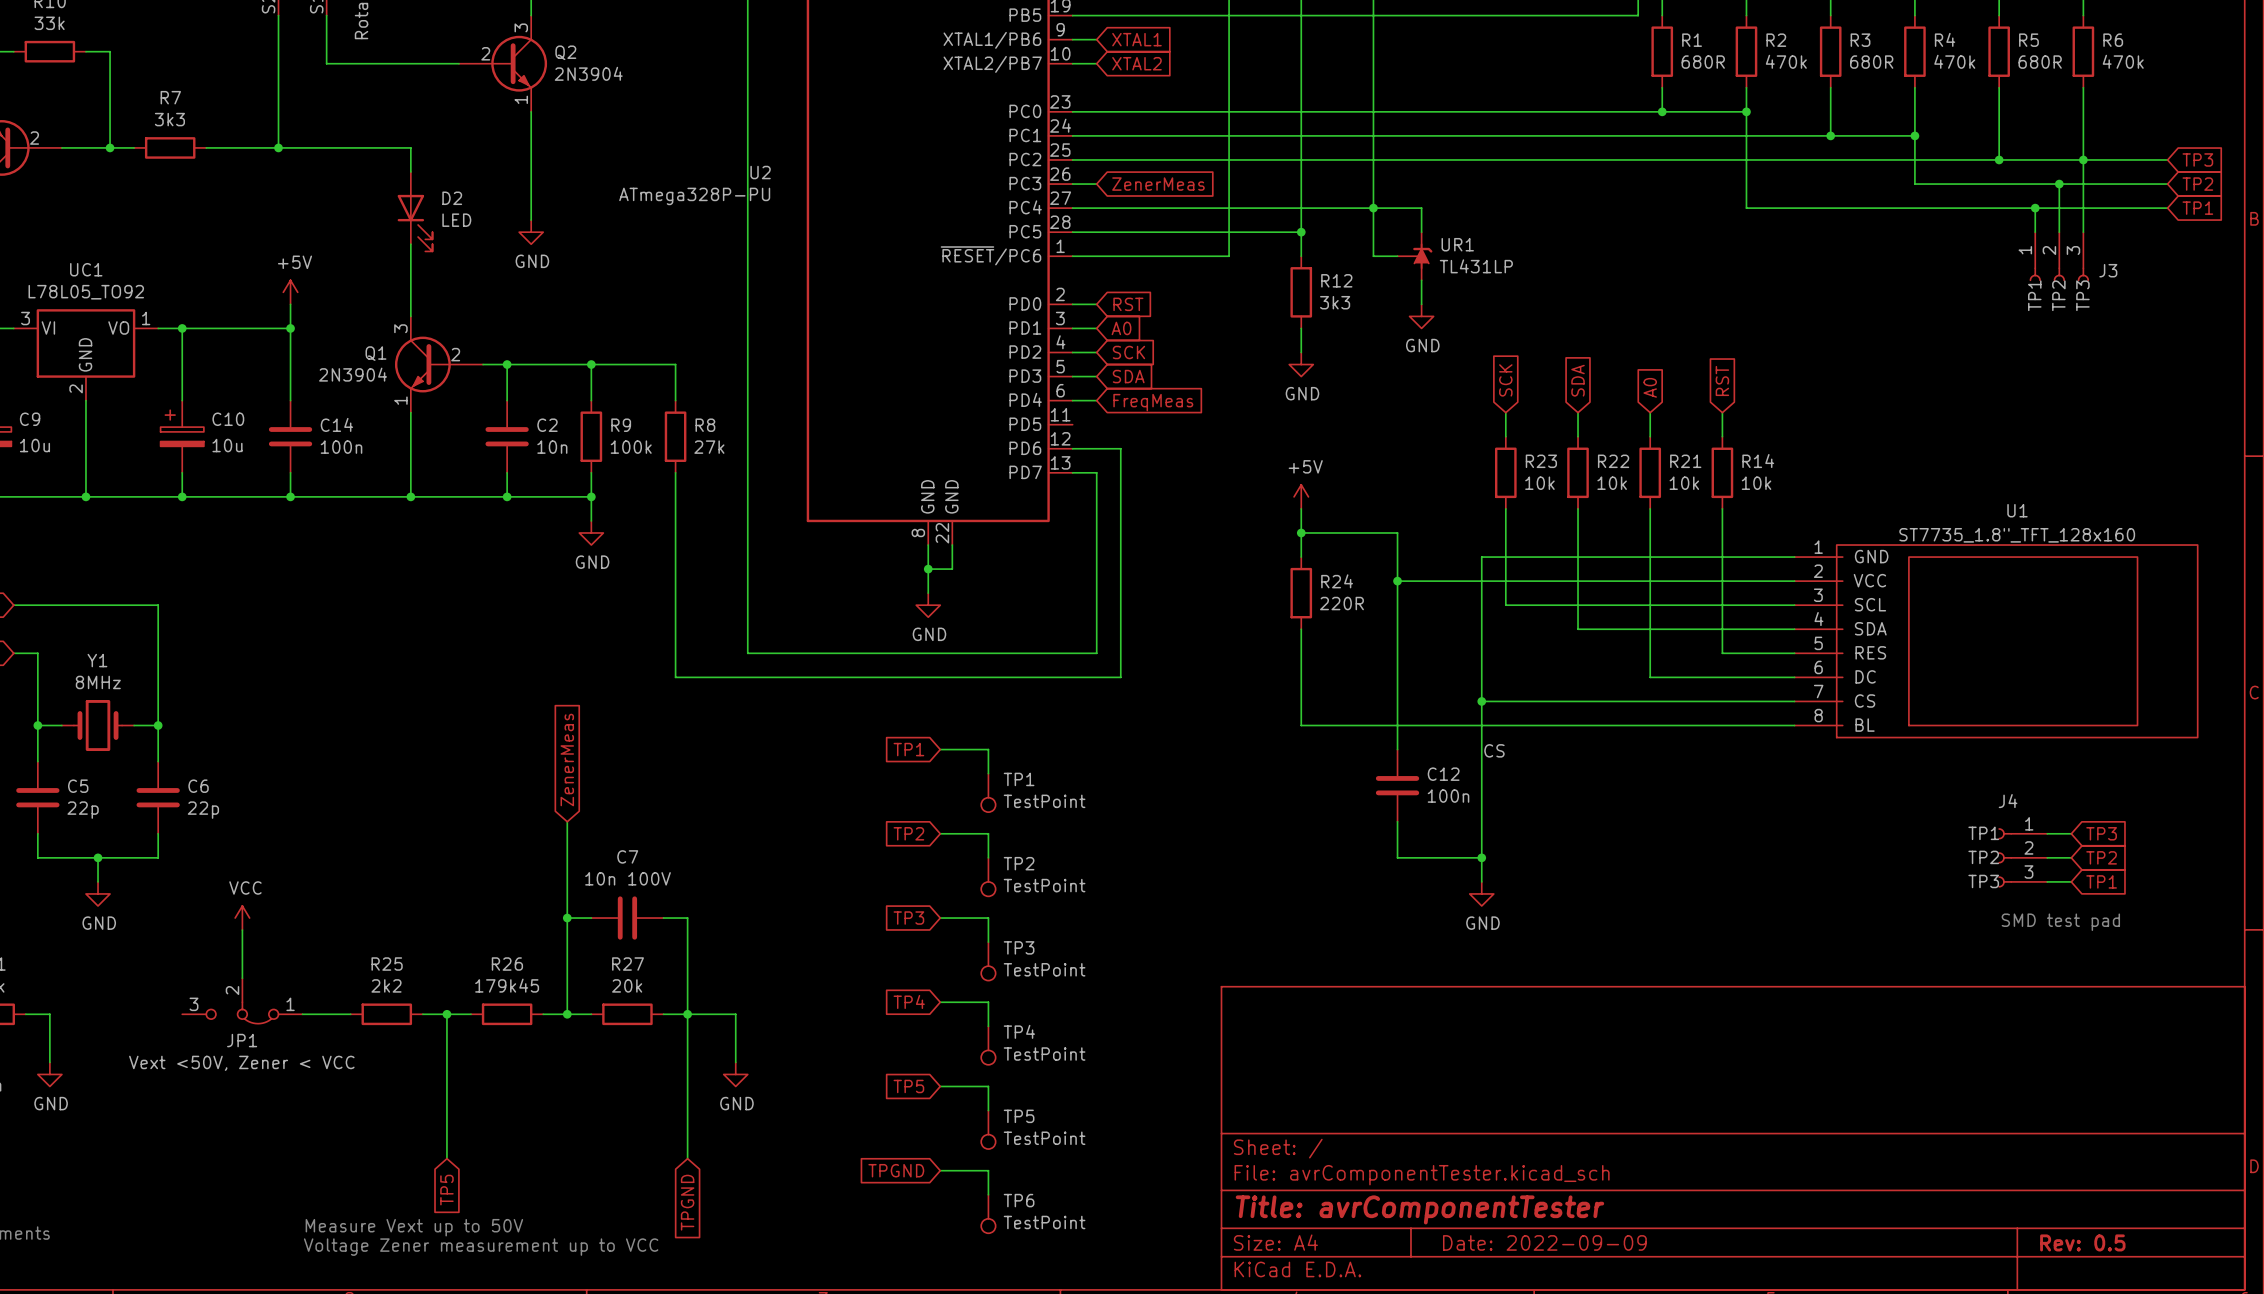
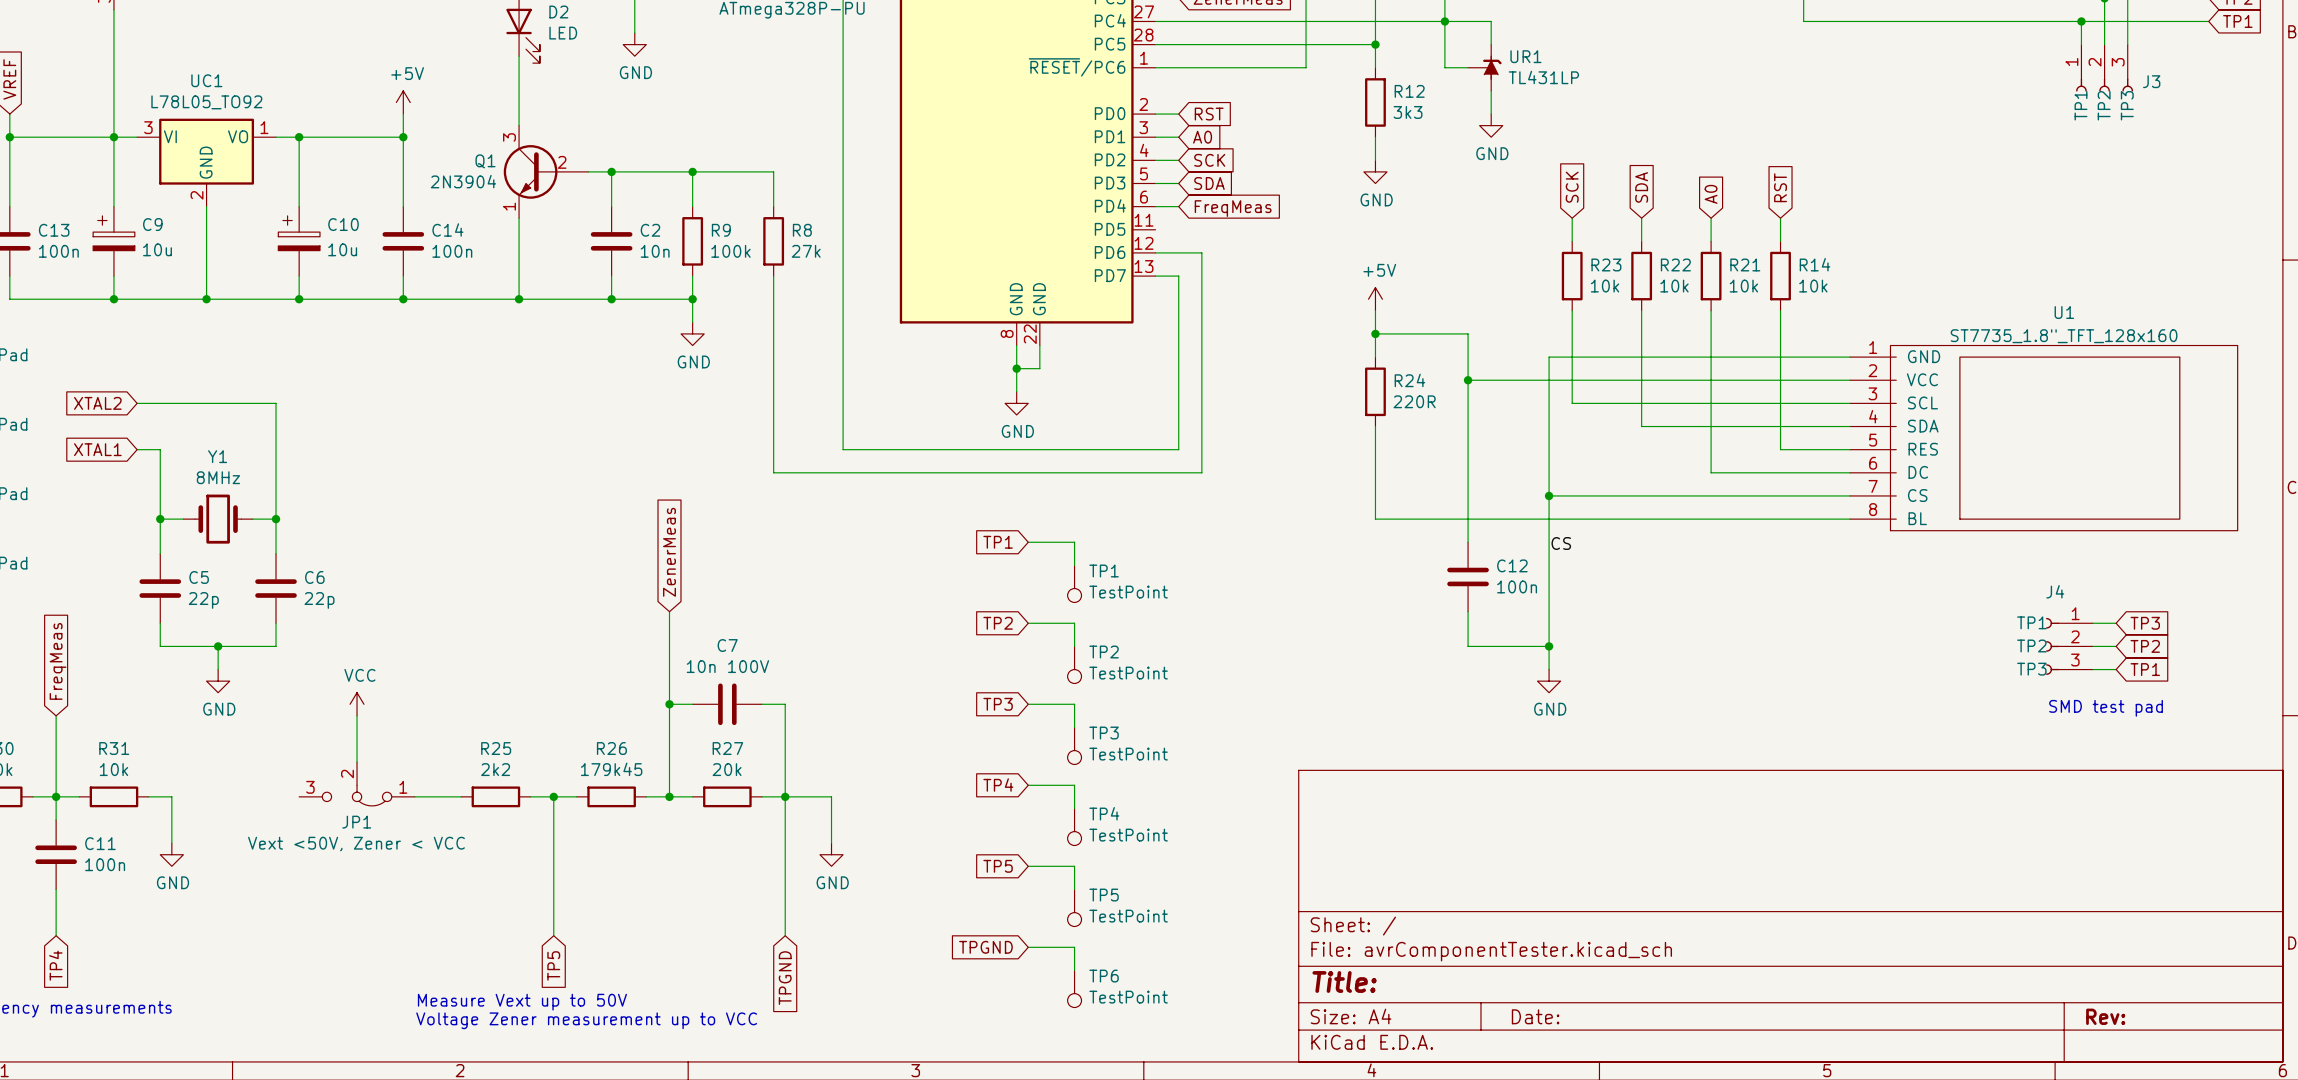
title block: Title: avrComponentTester (1419, 1209) -> Title: (1344, 982)
title block: Date: 2022-09-09 (1544, 1242) -> Date: (1535, 1016)
title block: Rev: 0.5 (2082, 1242) -> Rev: (2105, 1016)

